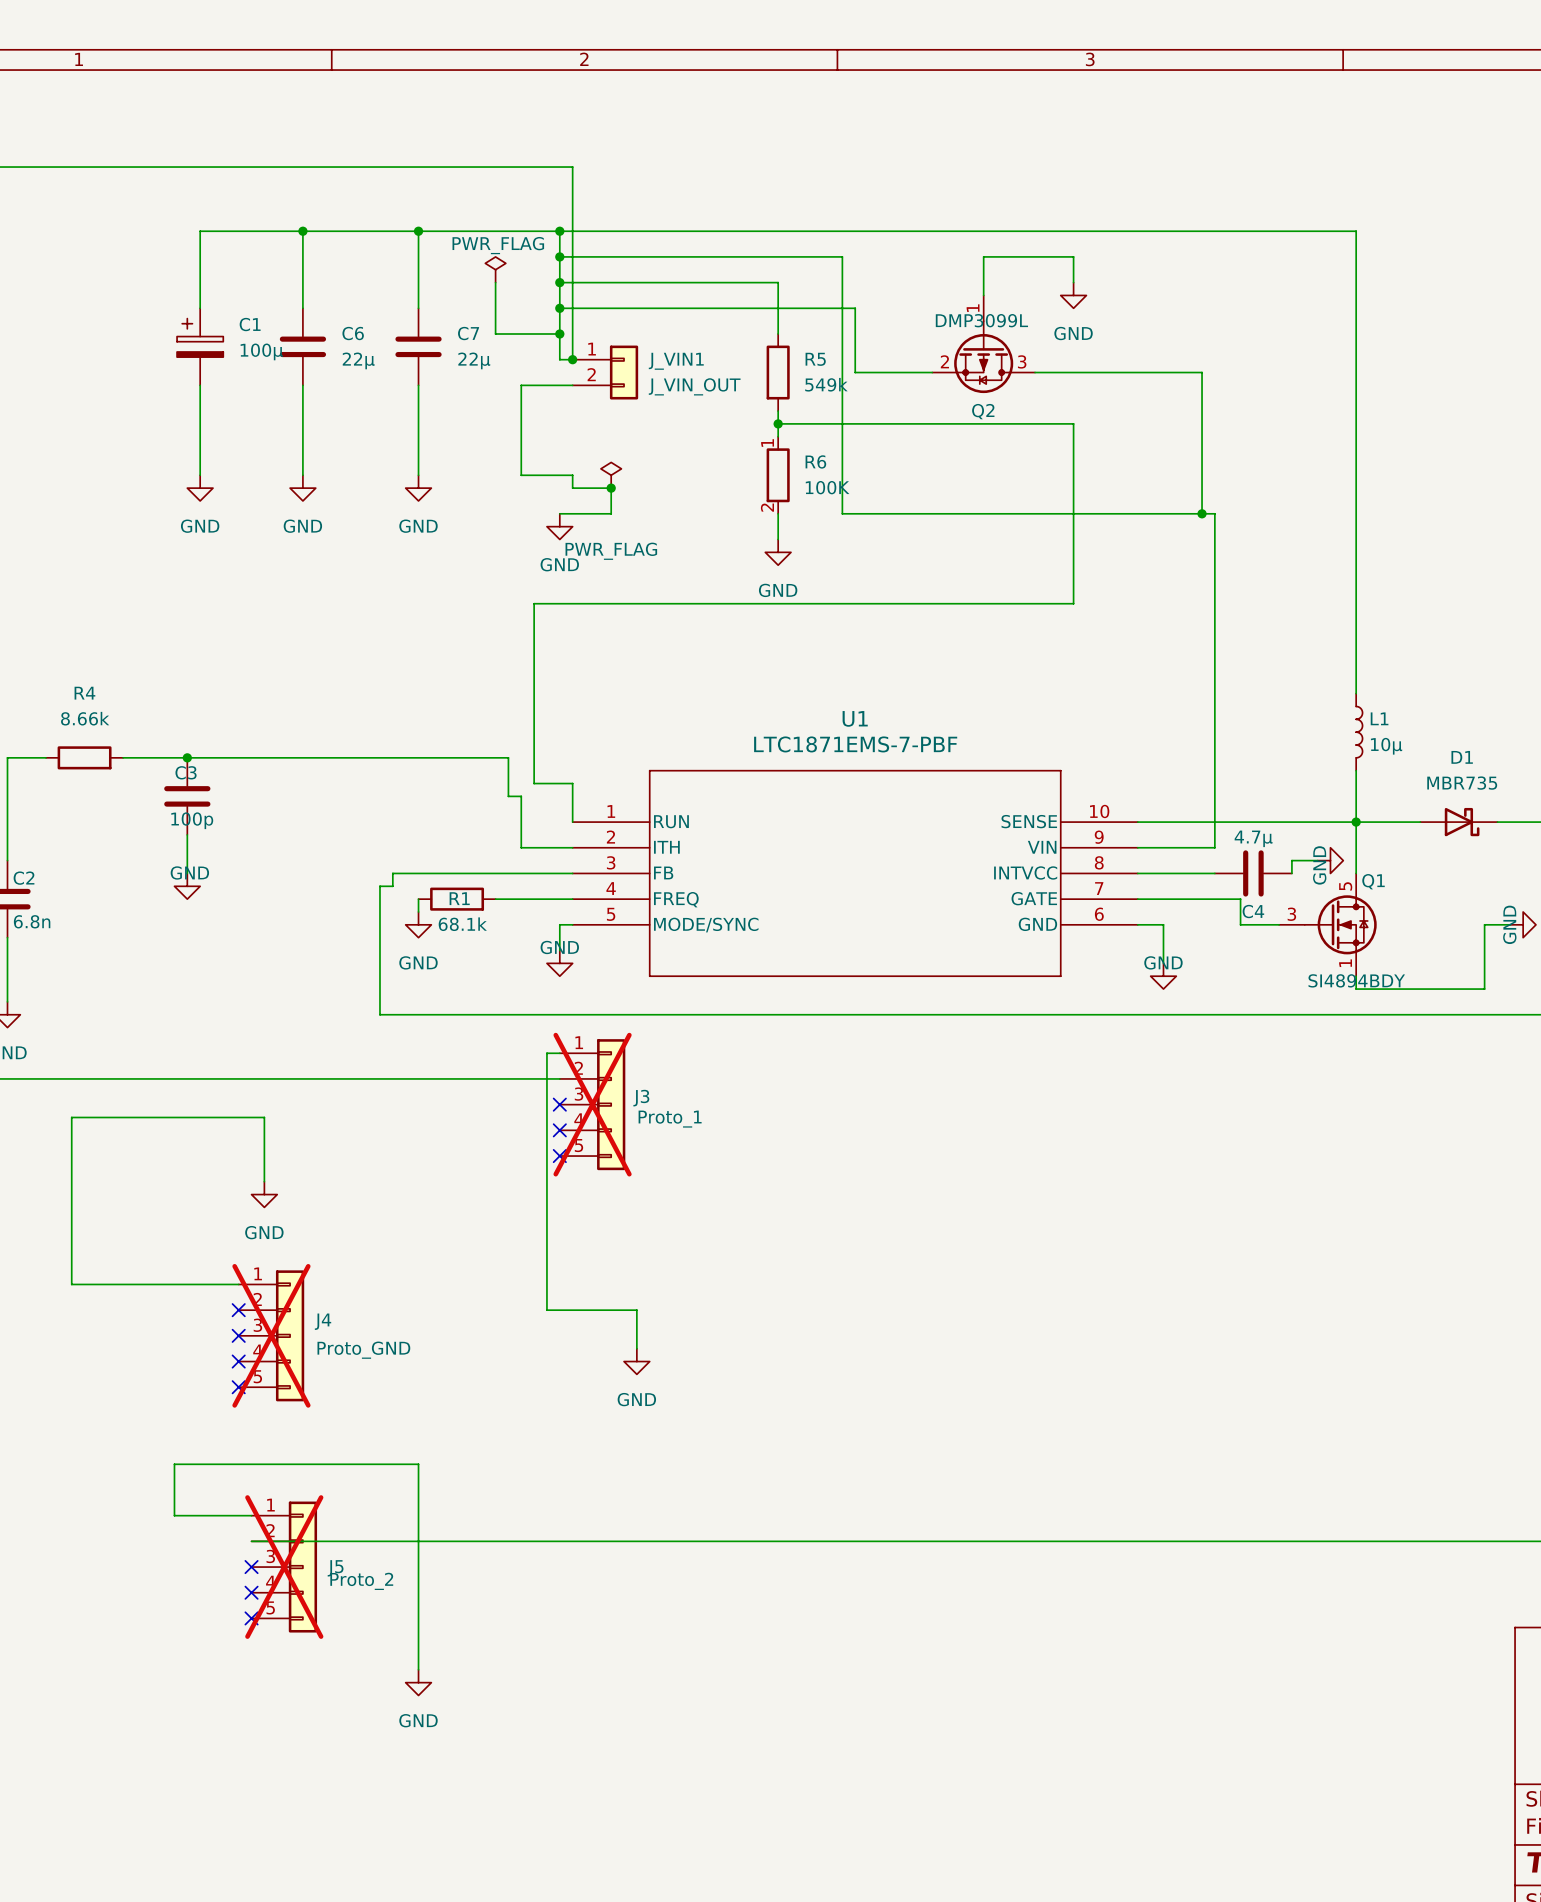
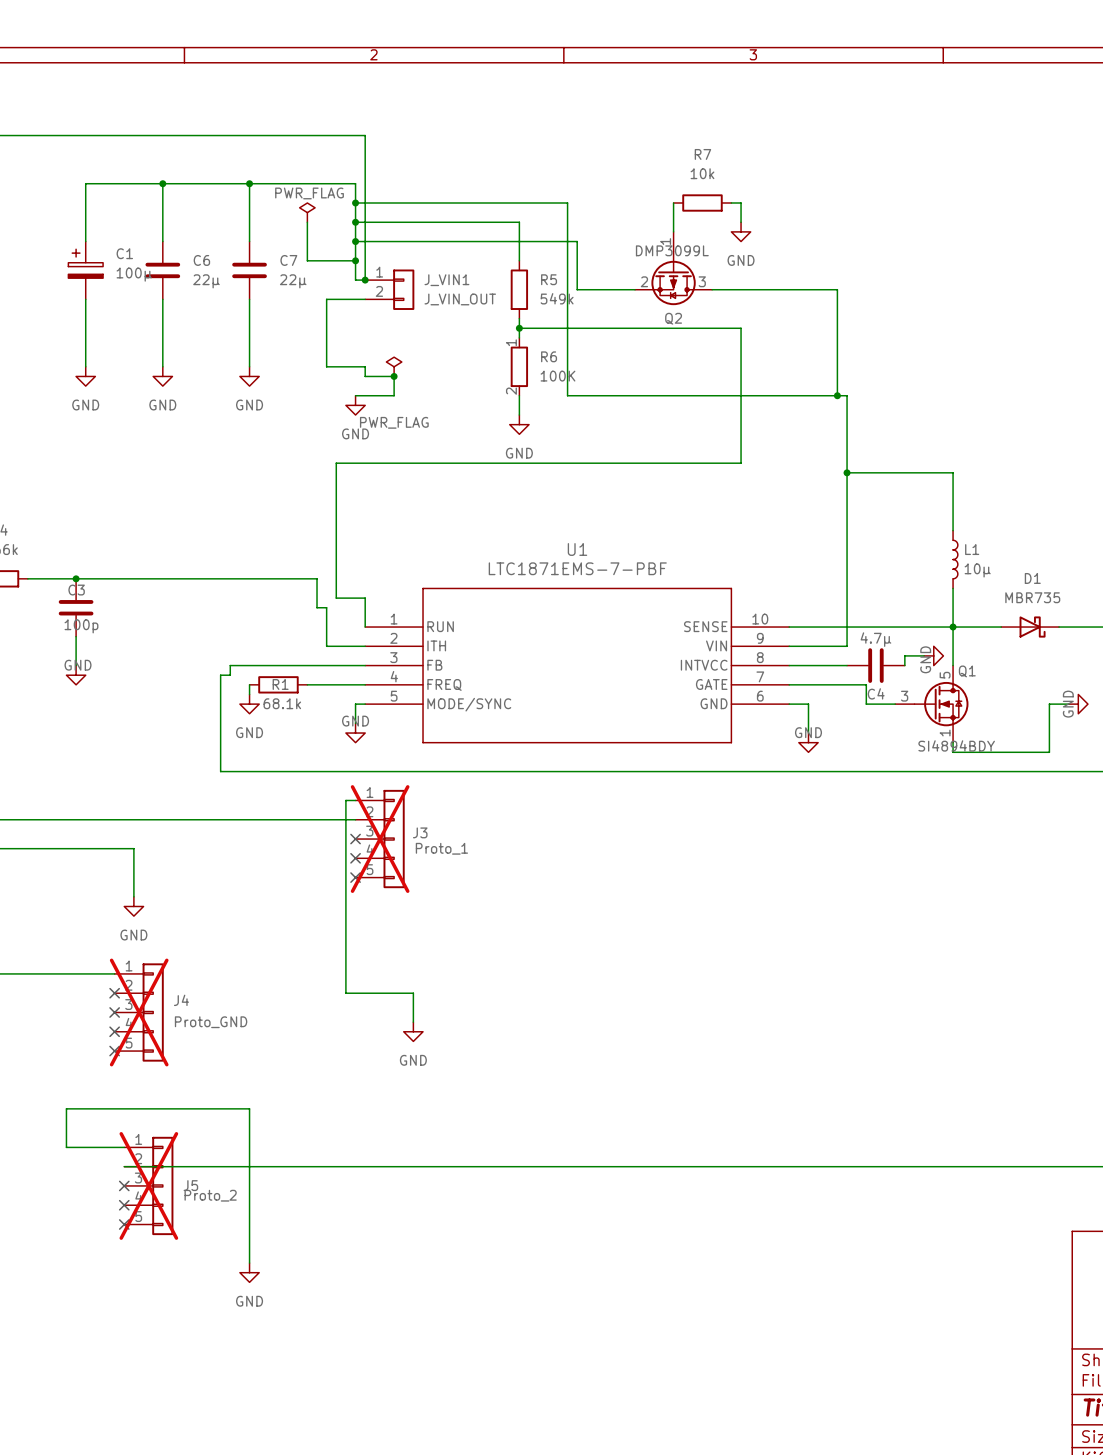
wire: (559, 231) (1356, 231) (1356, 616) -> (847, 472) (953, 472)
junction: (559, 231) -> none
wire: (983, 256) (1060, 256) -> none
R7: none -> 10k (702, 203)
junction: none -> (847, 472)

